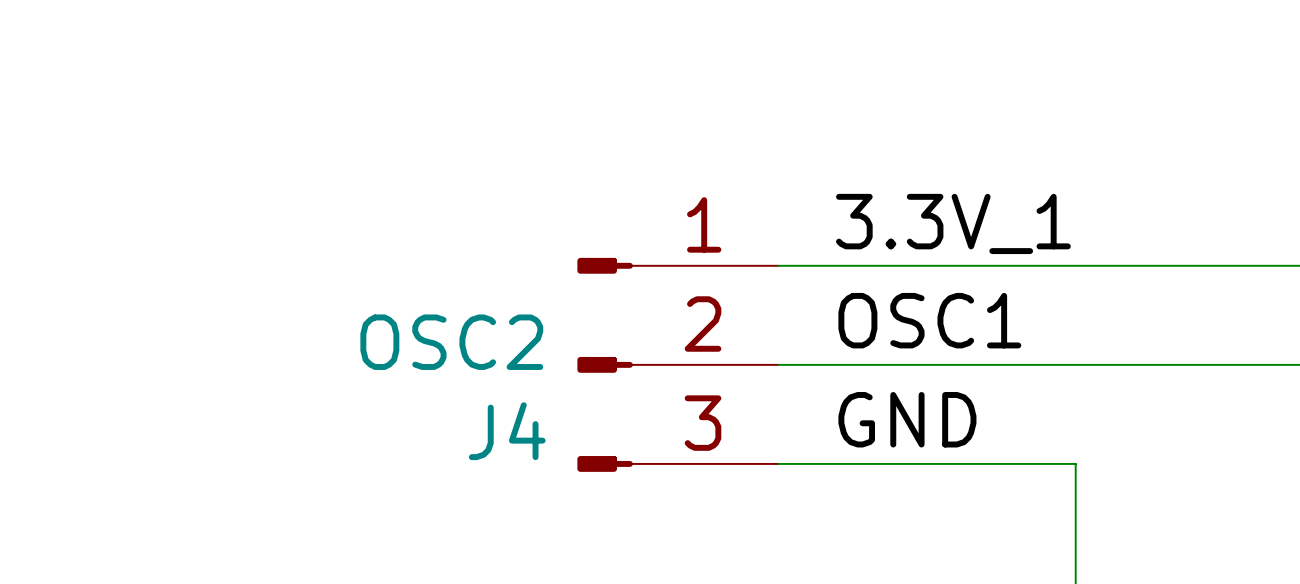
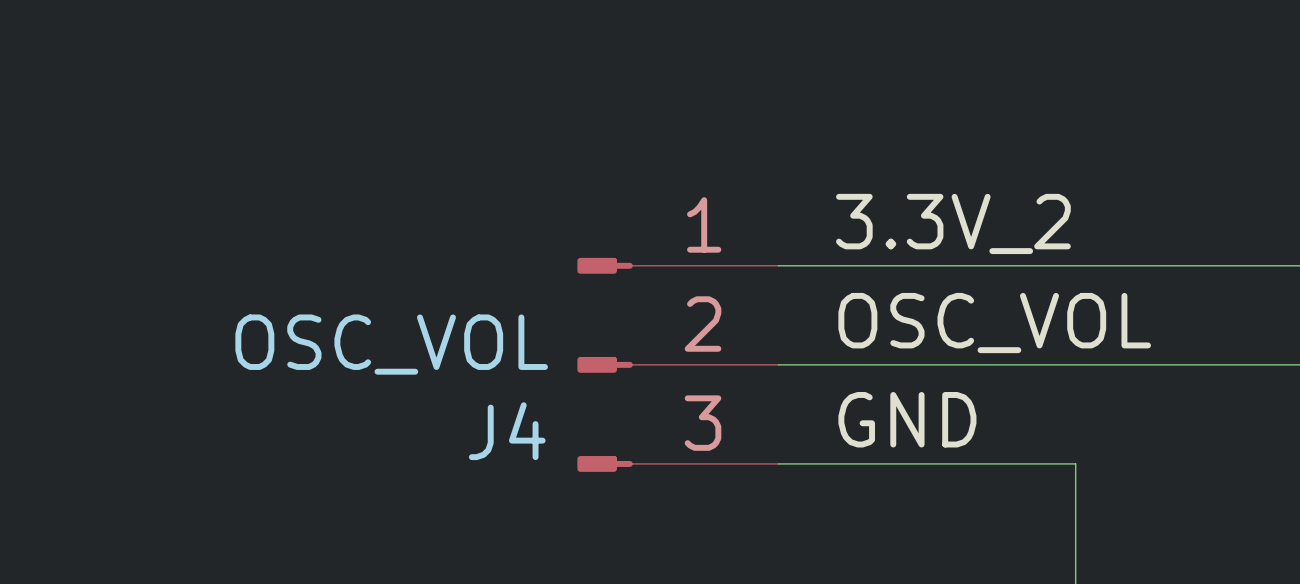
label: 3.3V_1 (953, 223) -> 3.3V_2 (953, 223)
label: OSC1 (929, 320) -> OSC_VOL (994, 323)
J4 value: OSC2 (451, 342) -> OSC_VOL (391, 344)

